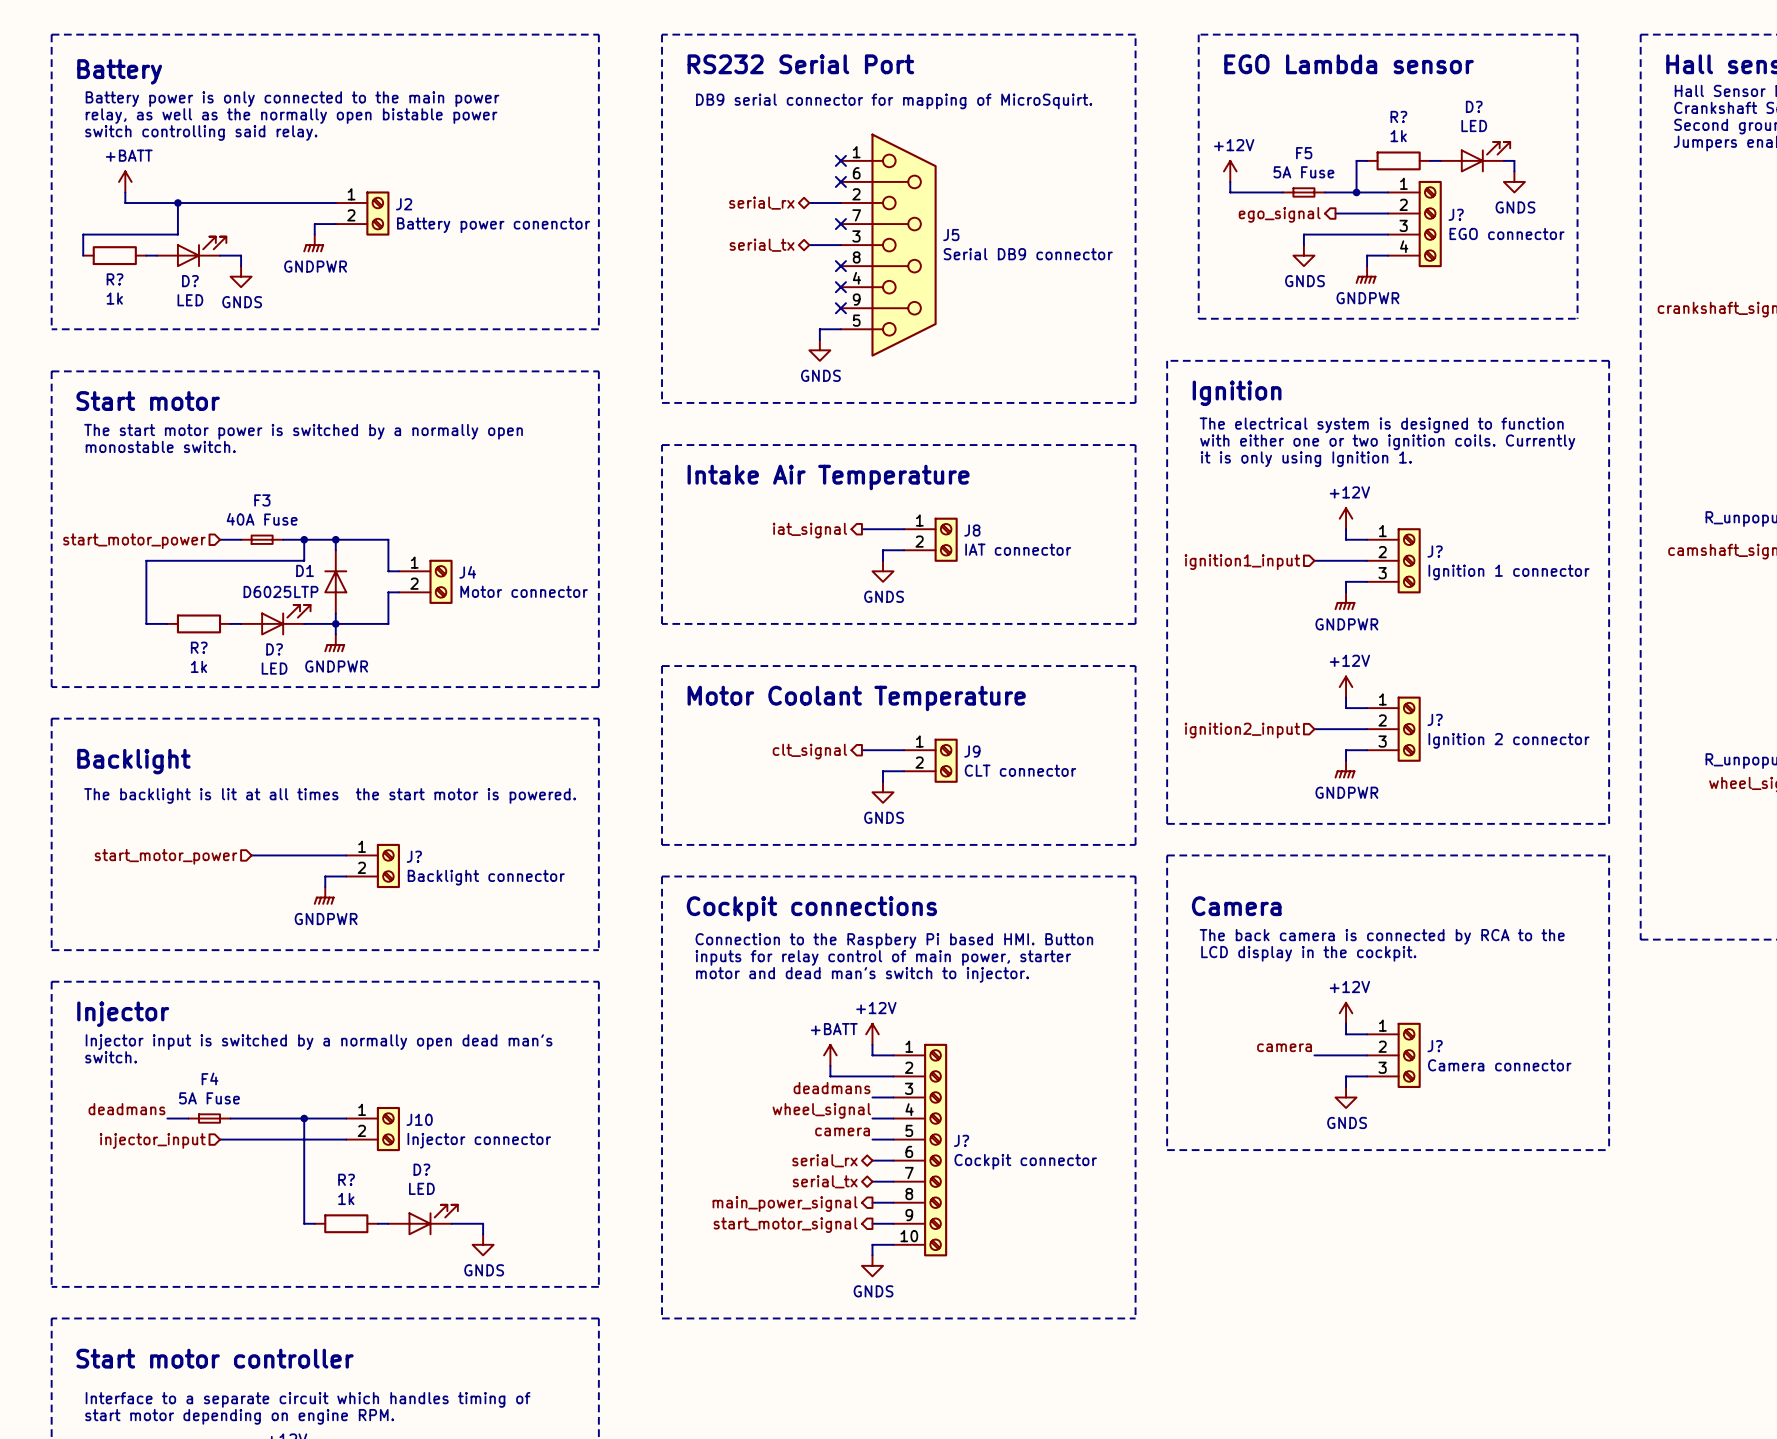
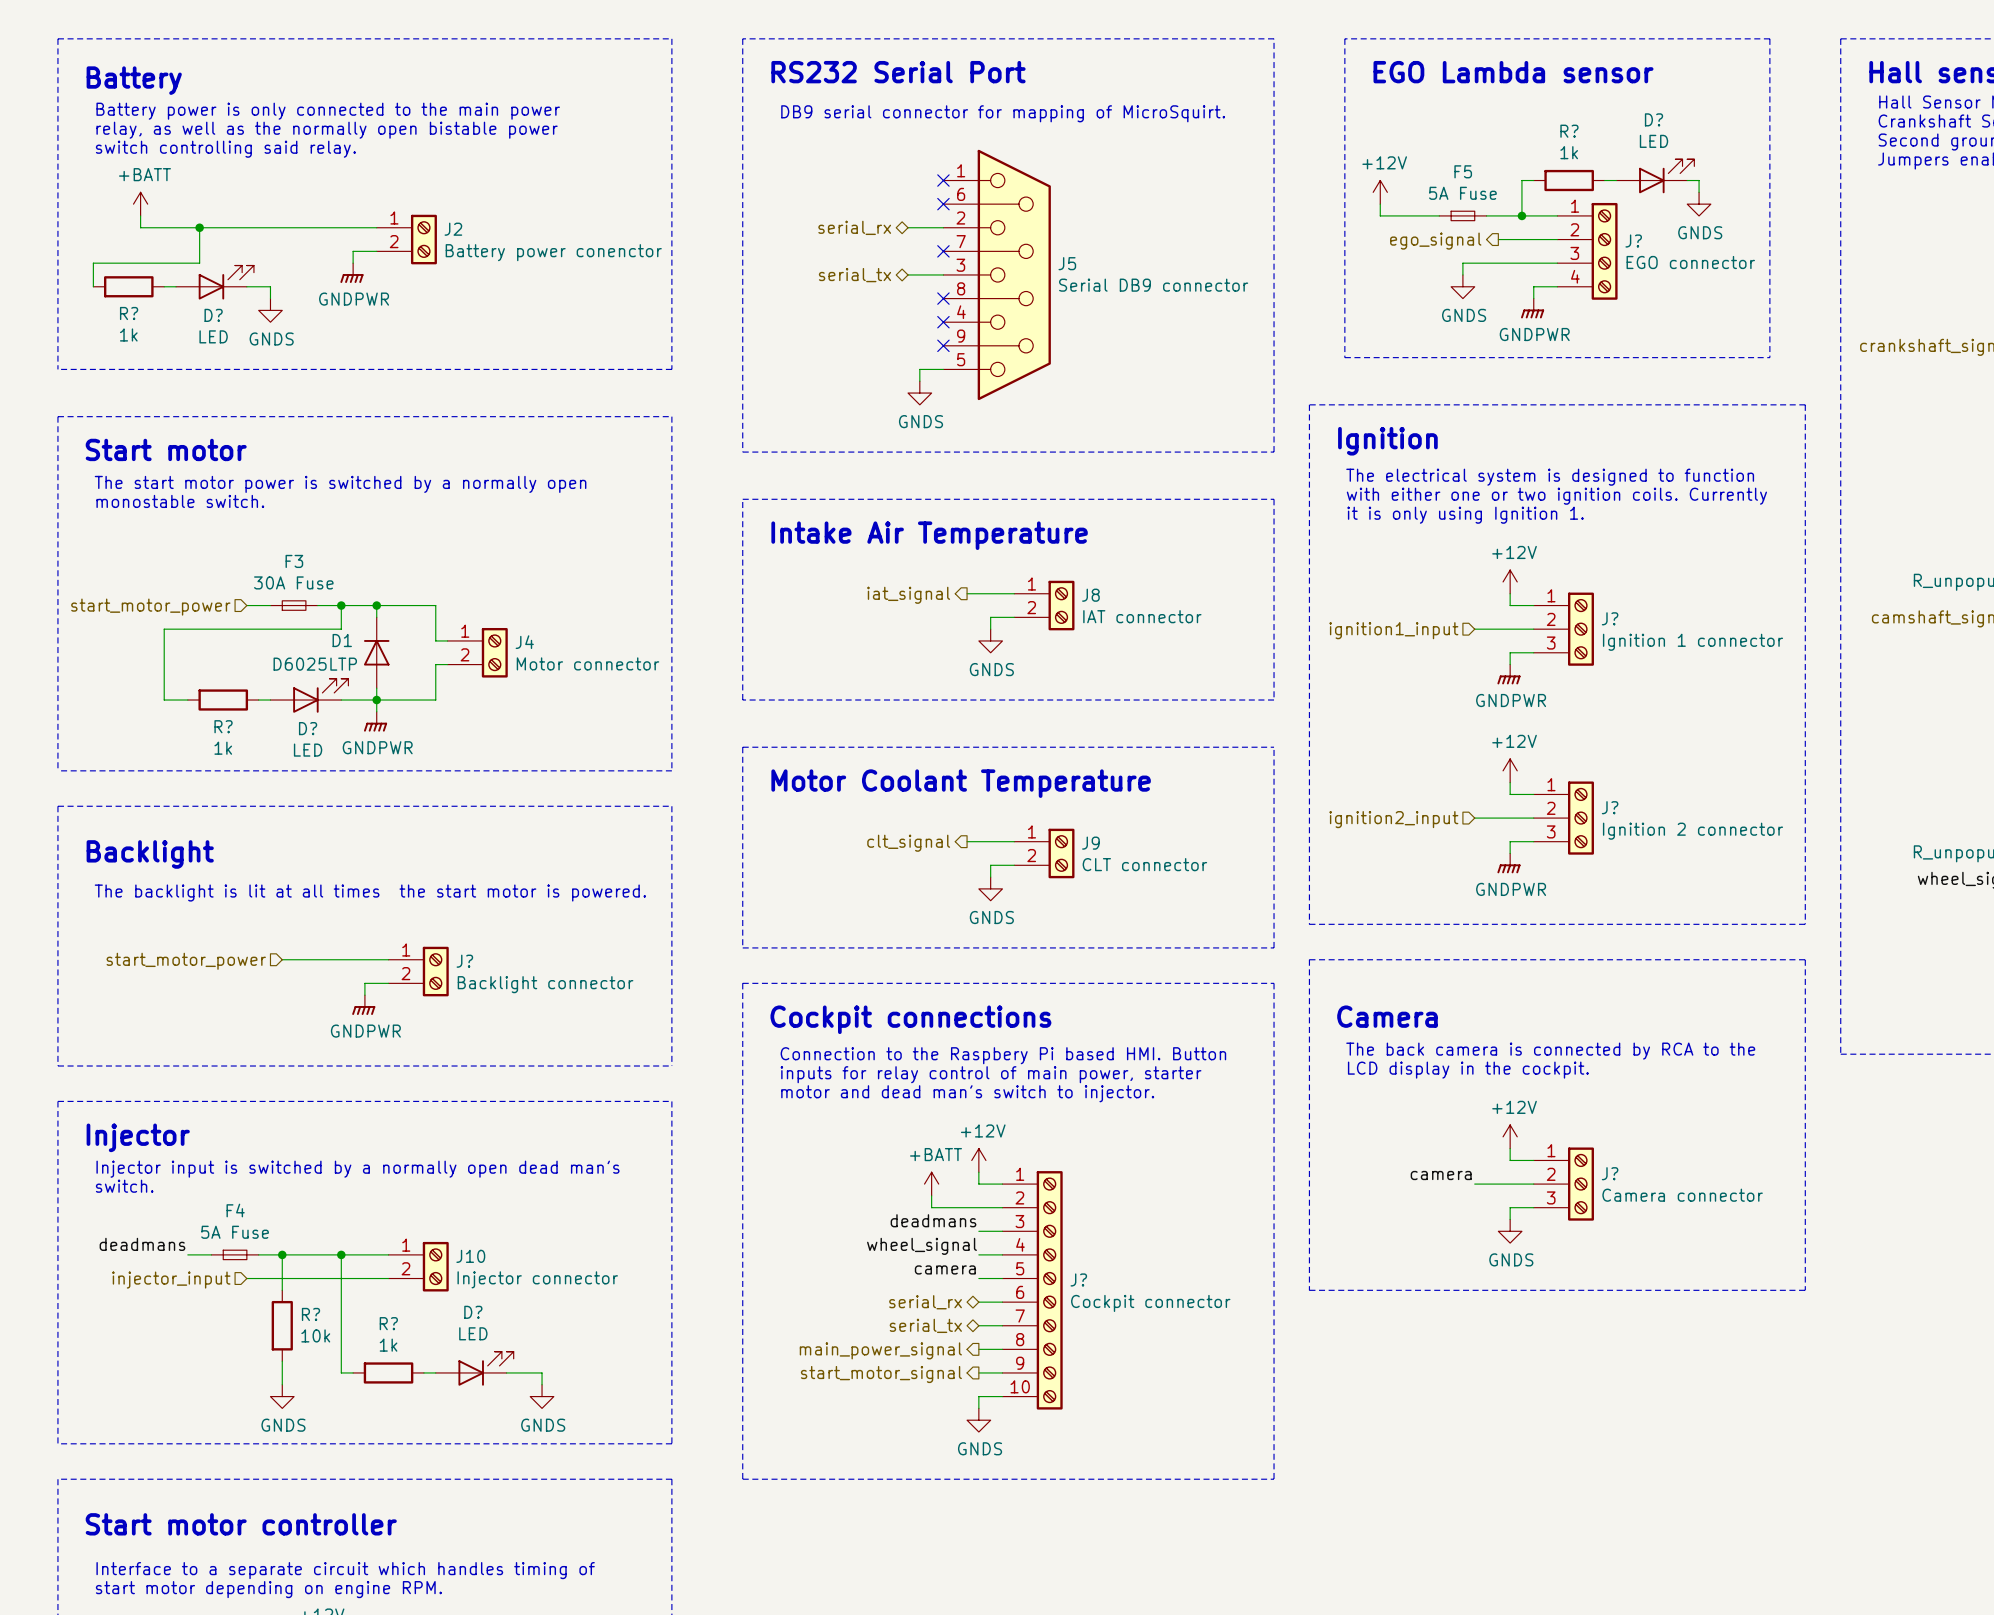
F3 value: 40A Fuse (262, 519) -> 30A Fuse (293, 582)
wire: none -> (282, 1254) (282, 1290)
junction: none -> (282, 1254)
R?: none -> 10k (282, 1325)
wire: none -> (282, 1361) (282, 1384)
power symbol: none -> GNDS (282, 1396)

